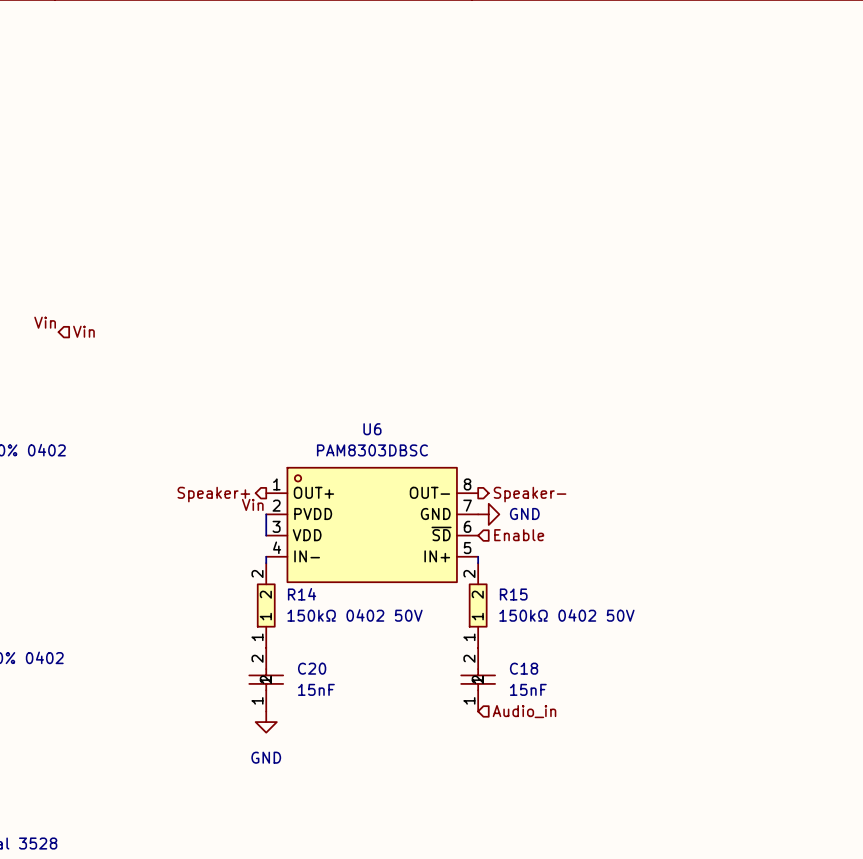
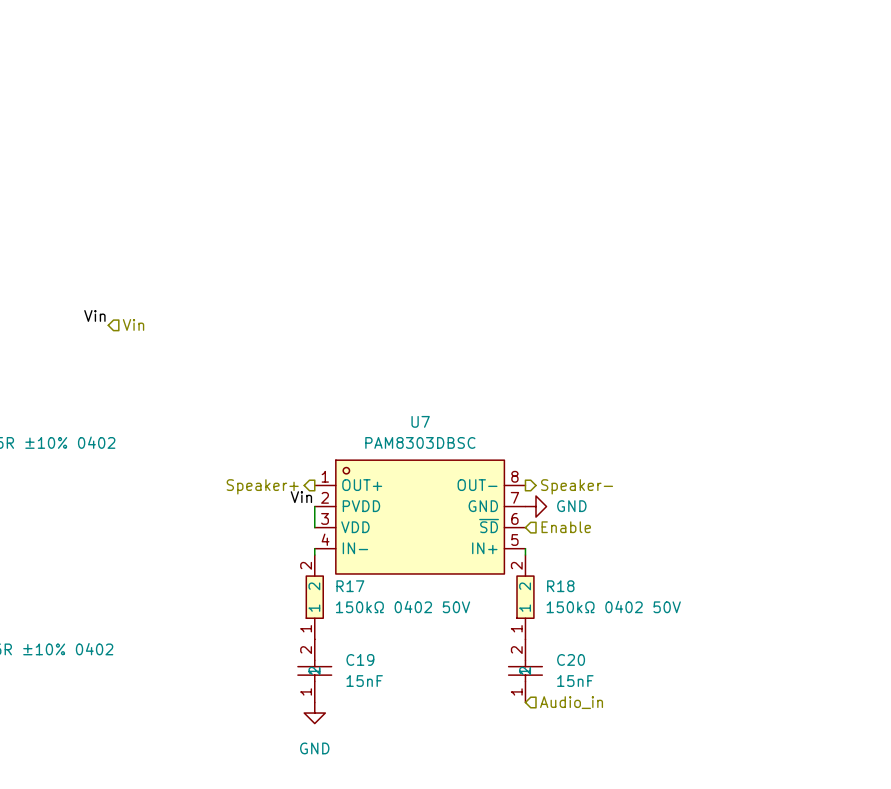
U6 name: U6 (372, 429) -> U7 (420, 421)
R14 name: R14 (302, 594) -> R17 (350, 586)
R15 name: R15 (513, 594) -> R18 (560, 586)
C20 name: C20 (312, 668) -> C19 (360, 659)
C18 name: C18 (524, 668) -> C20 (571, 659)

